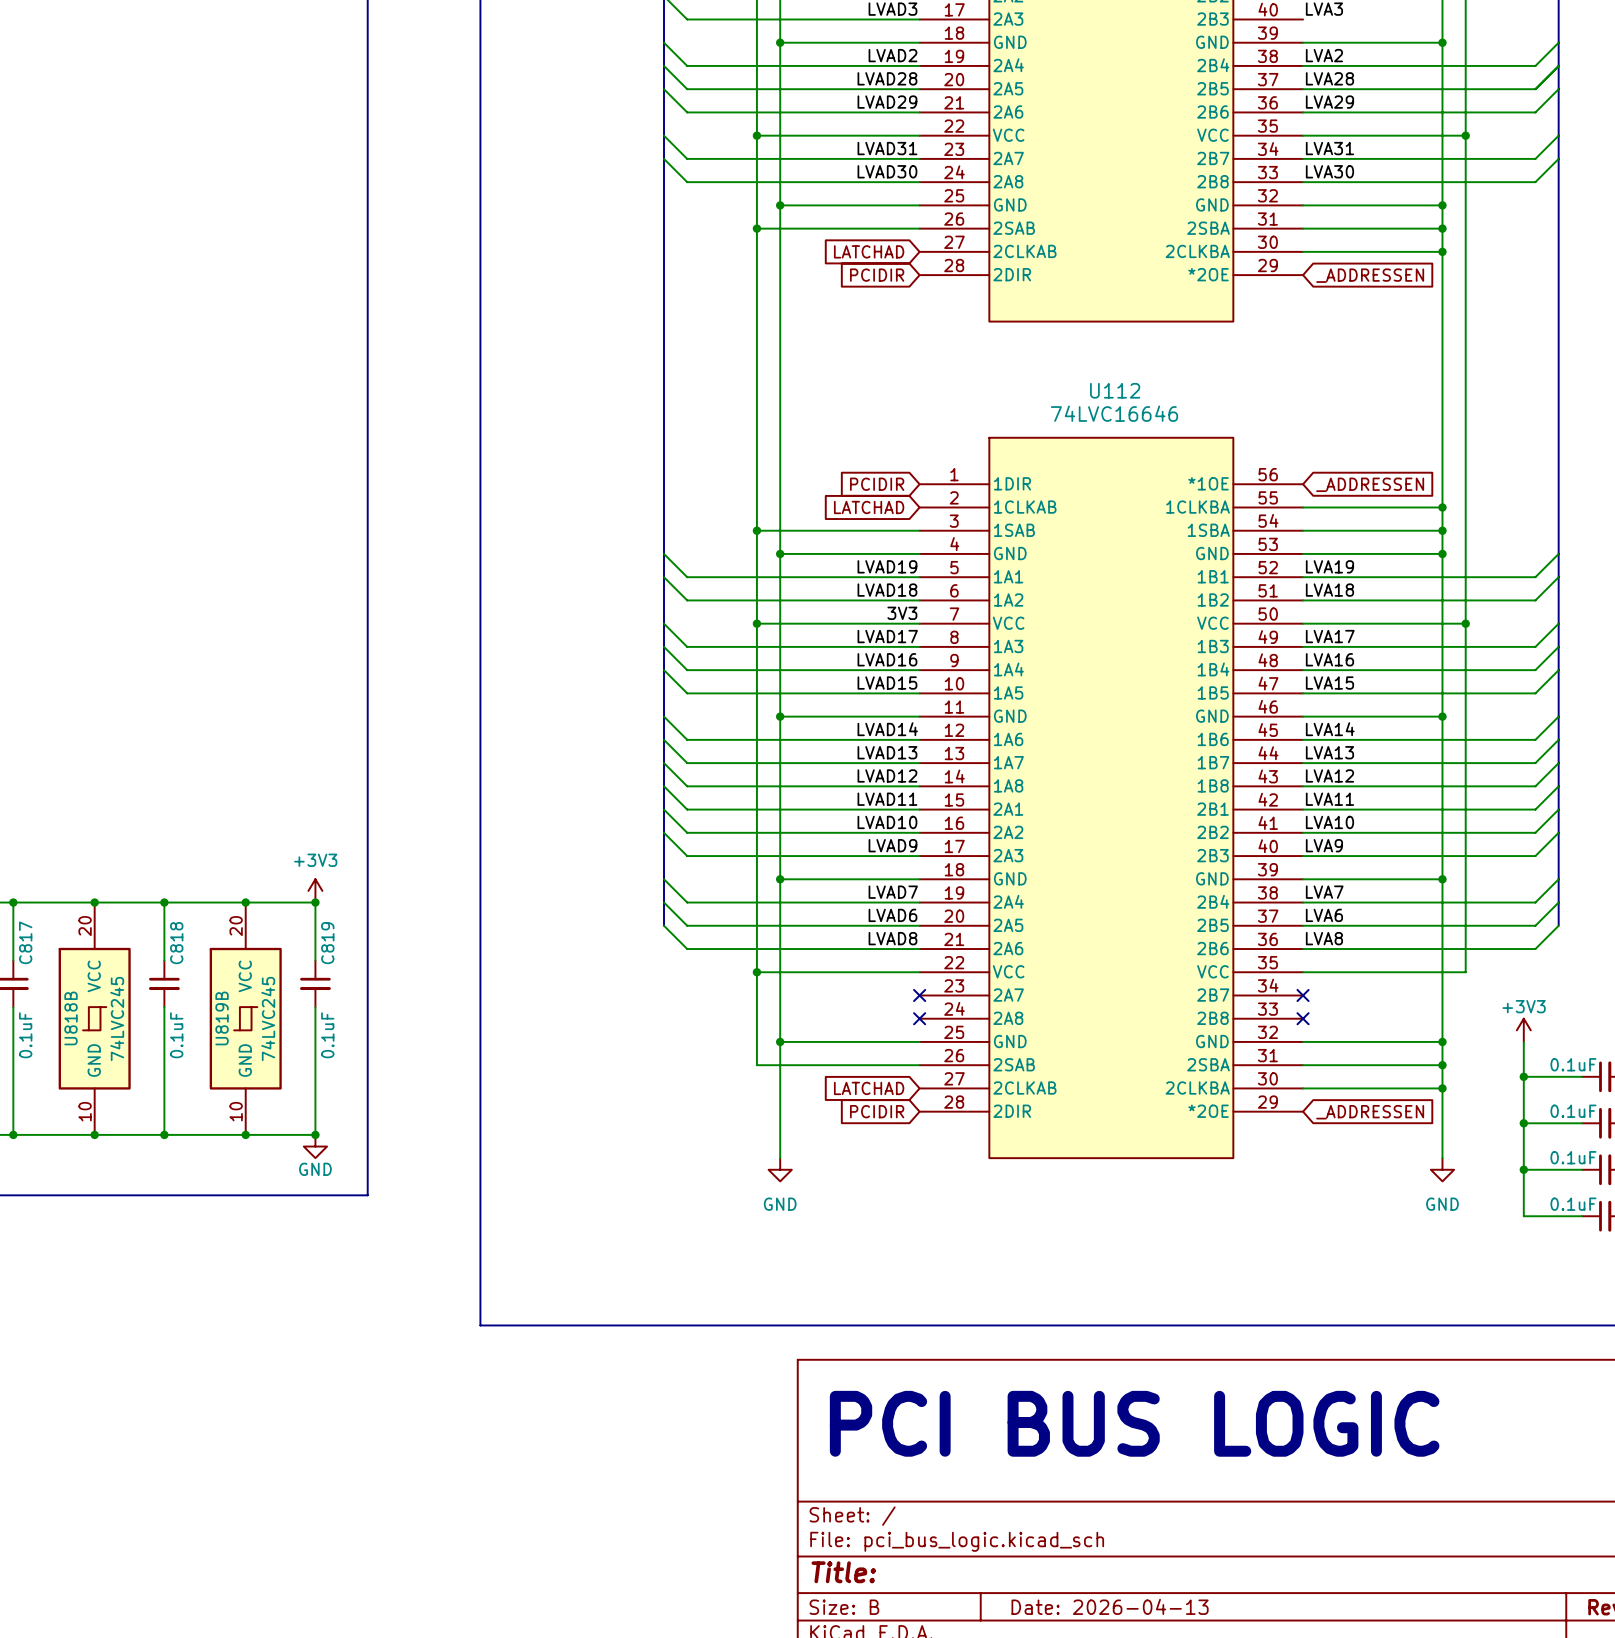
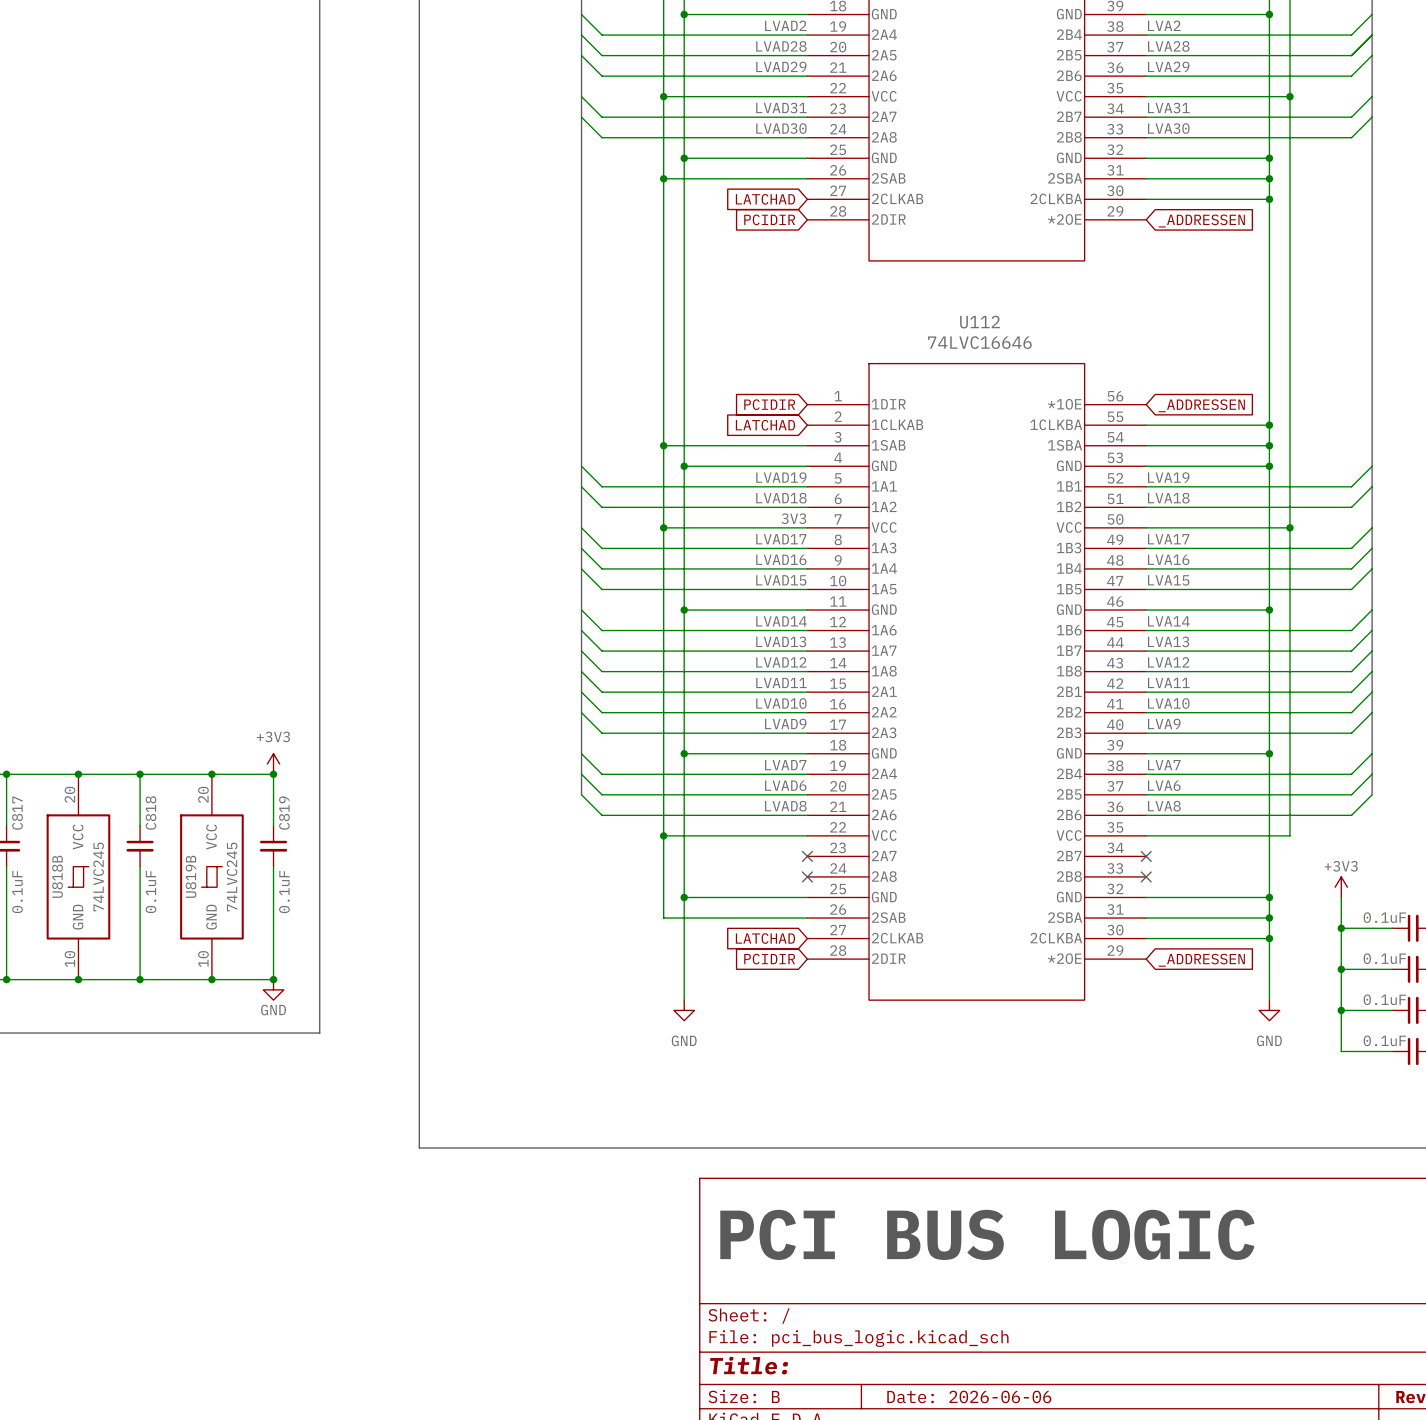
title block: Date: 2026-04-13 (1110, 1606) -> Date: 2026-06-06 (969, 1396)

